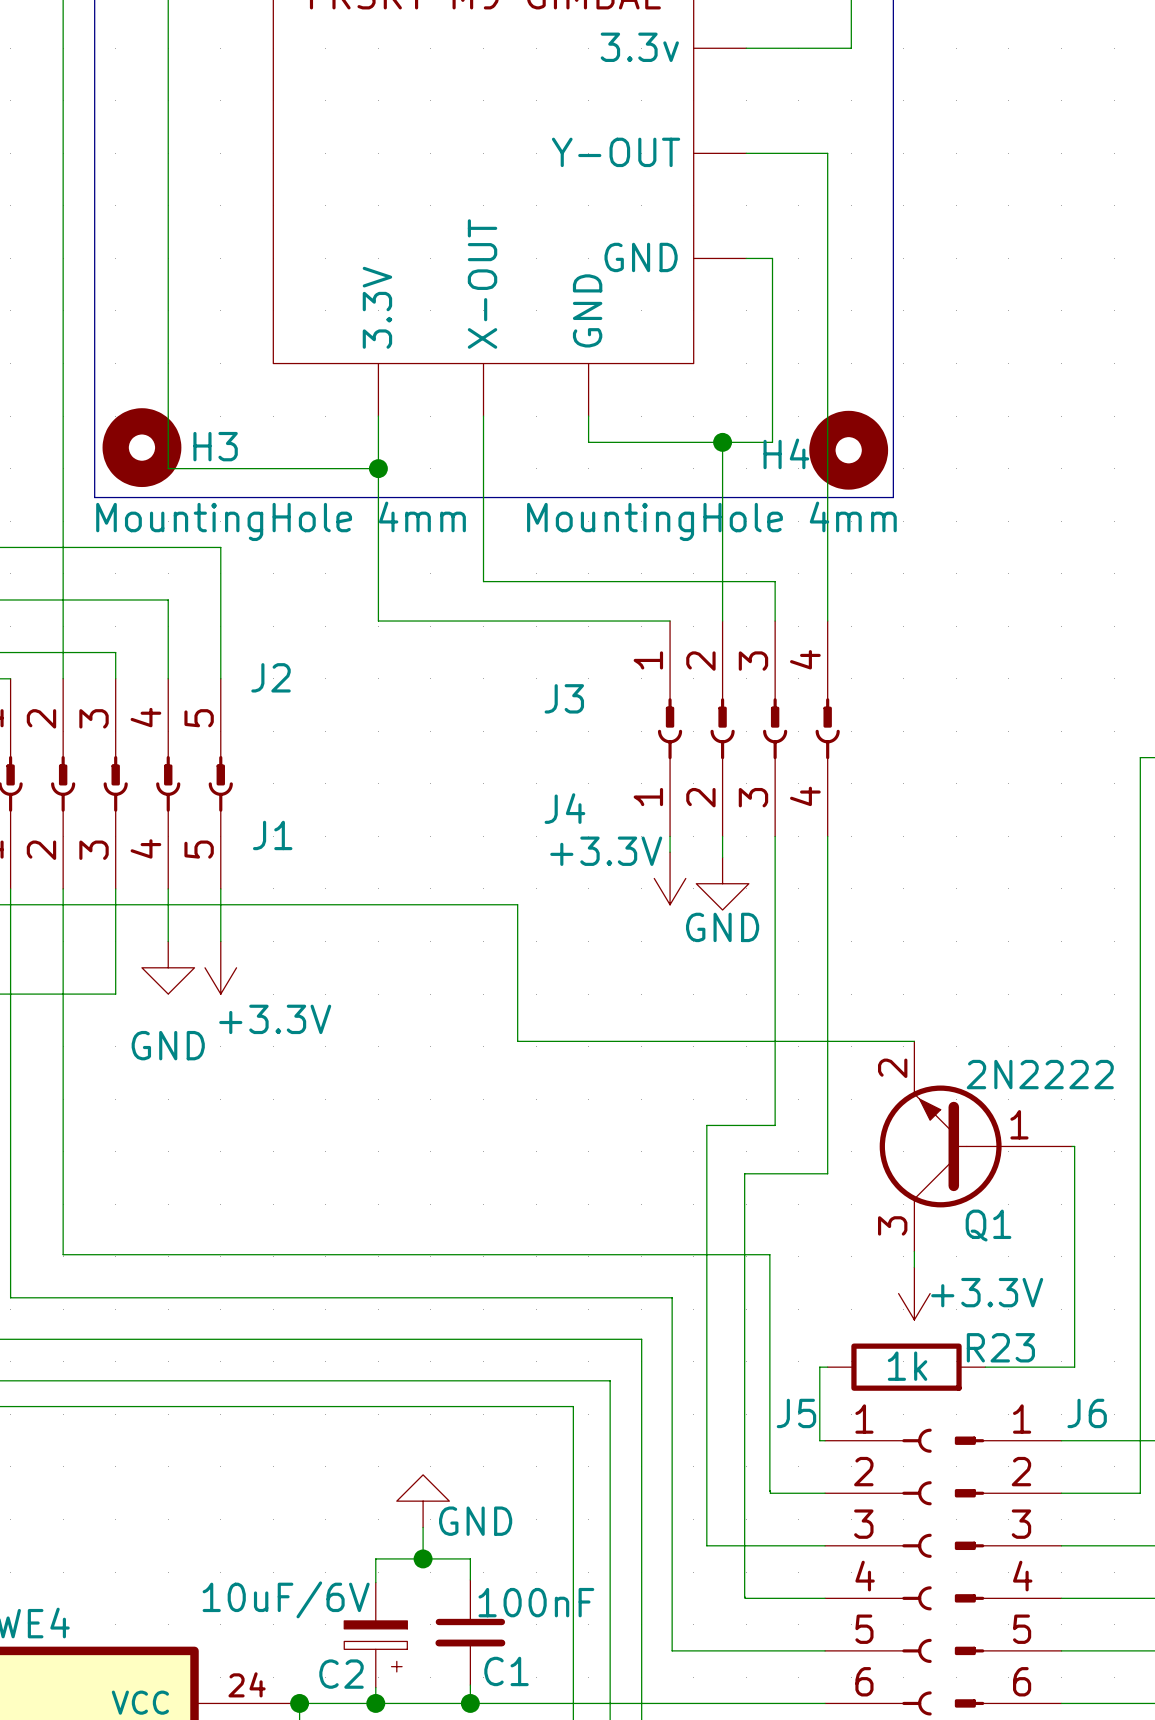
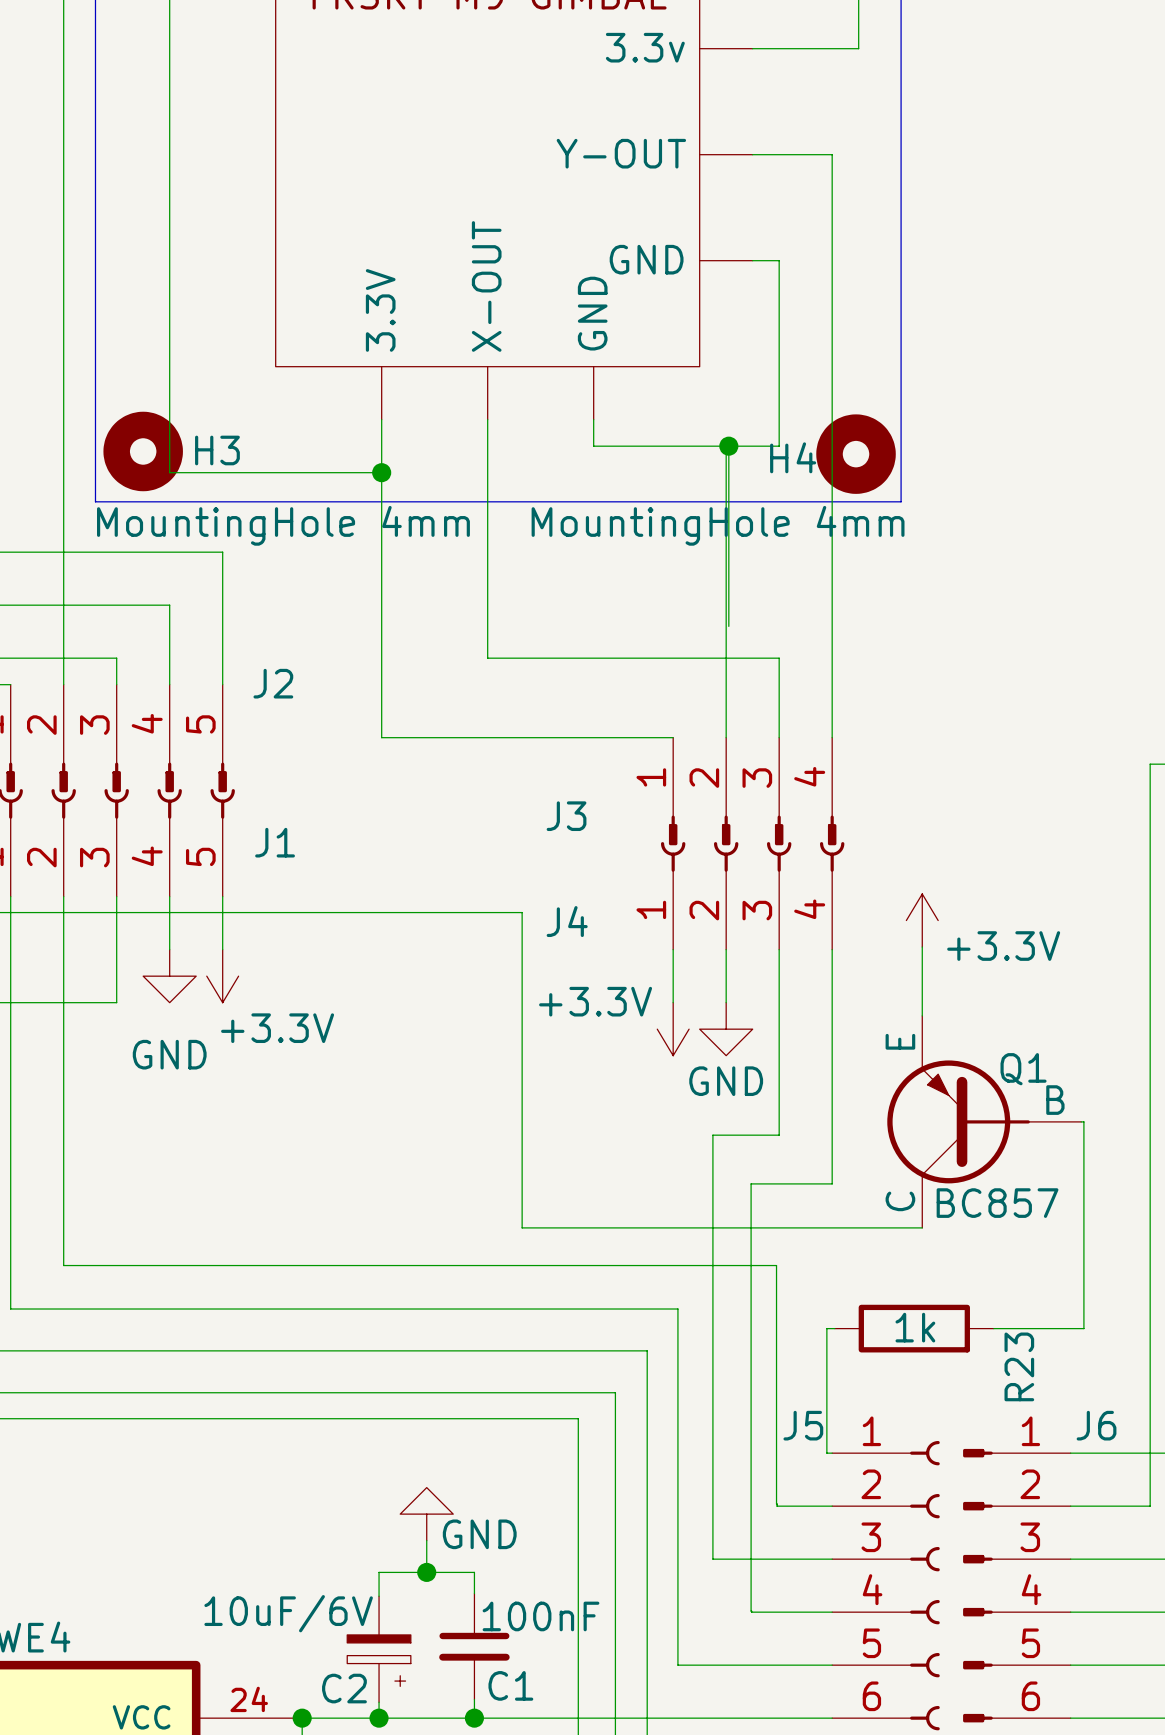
wire: (825, 153) (827, 153) (827, 621) -> (832, 154) (832, 737)
wire: none -> (726, 446) (726, 737)
wire: (483, 581) (775, 581) (775, 621) -> (487, 586) (487, 658) (779, 658) (779, 737)
wire: (378, 621) (670, 621) -> (381, 626) (381, 737) (673, 737)
J3 position: (748, 674) -> (752, 791)
J4 position: (748, 783) -> (752, 895)
wire: (670, 836) (670, 852) -> none
wire: (722, 836) (722, 857) -> none
wire: (775, 836) (775, 1125) (772, 1125) -> (779, 949) (779, 1135)
wire: (827, 836) (827, 1173) (825, 1173) -> (832, 949) (832, 1183)
power symbol: +3.3V (670, 878) -> none
power symbol position: GND (722, 883) -> GND (726, 1029)
power symbol: none -> +3.3V (922, 920)
power symbol text position: GND (722, 927) -> GND (726, 1081)
wire: none -> (922, 947) (922, 1015)
wire: none -> (673, 949) (673, 1002)
wire: none -> (726, 949) (726, 1002)
power symbol: none -> +3.3V (673, 1029)
wire: (517, 1041) (914, 1041) -> (522, 1050) (522, 1227) (922, 1227)
Q1 symbol: [879, 1041, 1073, 1252] -> [887, 1015, 1082, 1228]
Q1 value: 2N2222 (1040, 1074) -> BC857 (997, 1203)
wire: (1072, 1146) (1074, 1146) -> (1081, 1121) (1083, 1121) (1083, 1156)
Q1 name position: Q1 (988, 1225) -> Q1 (1023, 1069)
wire: (914, 1251) (914, 1267) -> none
power symbol: +3.3V (914, 1293) -> none
wire: (1074, 1317) (1074, 1367) (985, 1367) -> (1083, 1328) (993, 1328)
R23 name rotation: 0° (1000, 1347) -> 90° counterclockwise (1019, 1366)
wire: (819, 1367) (827, 1367) -> (826, 1378) (826, 1328) (834, 1328)
R23 position: (906, 1367) -> (914, 1328)

